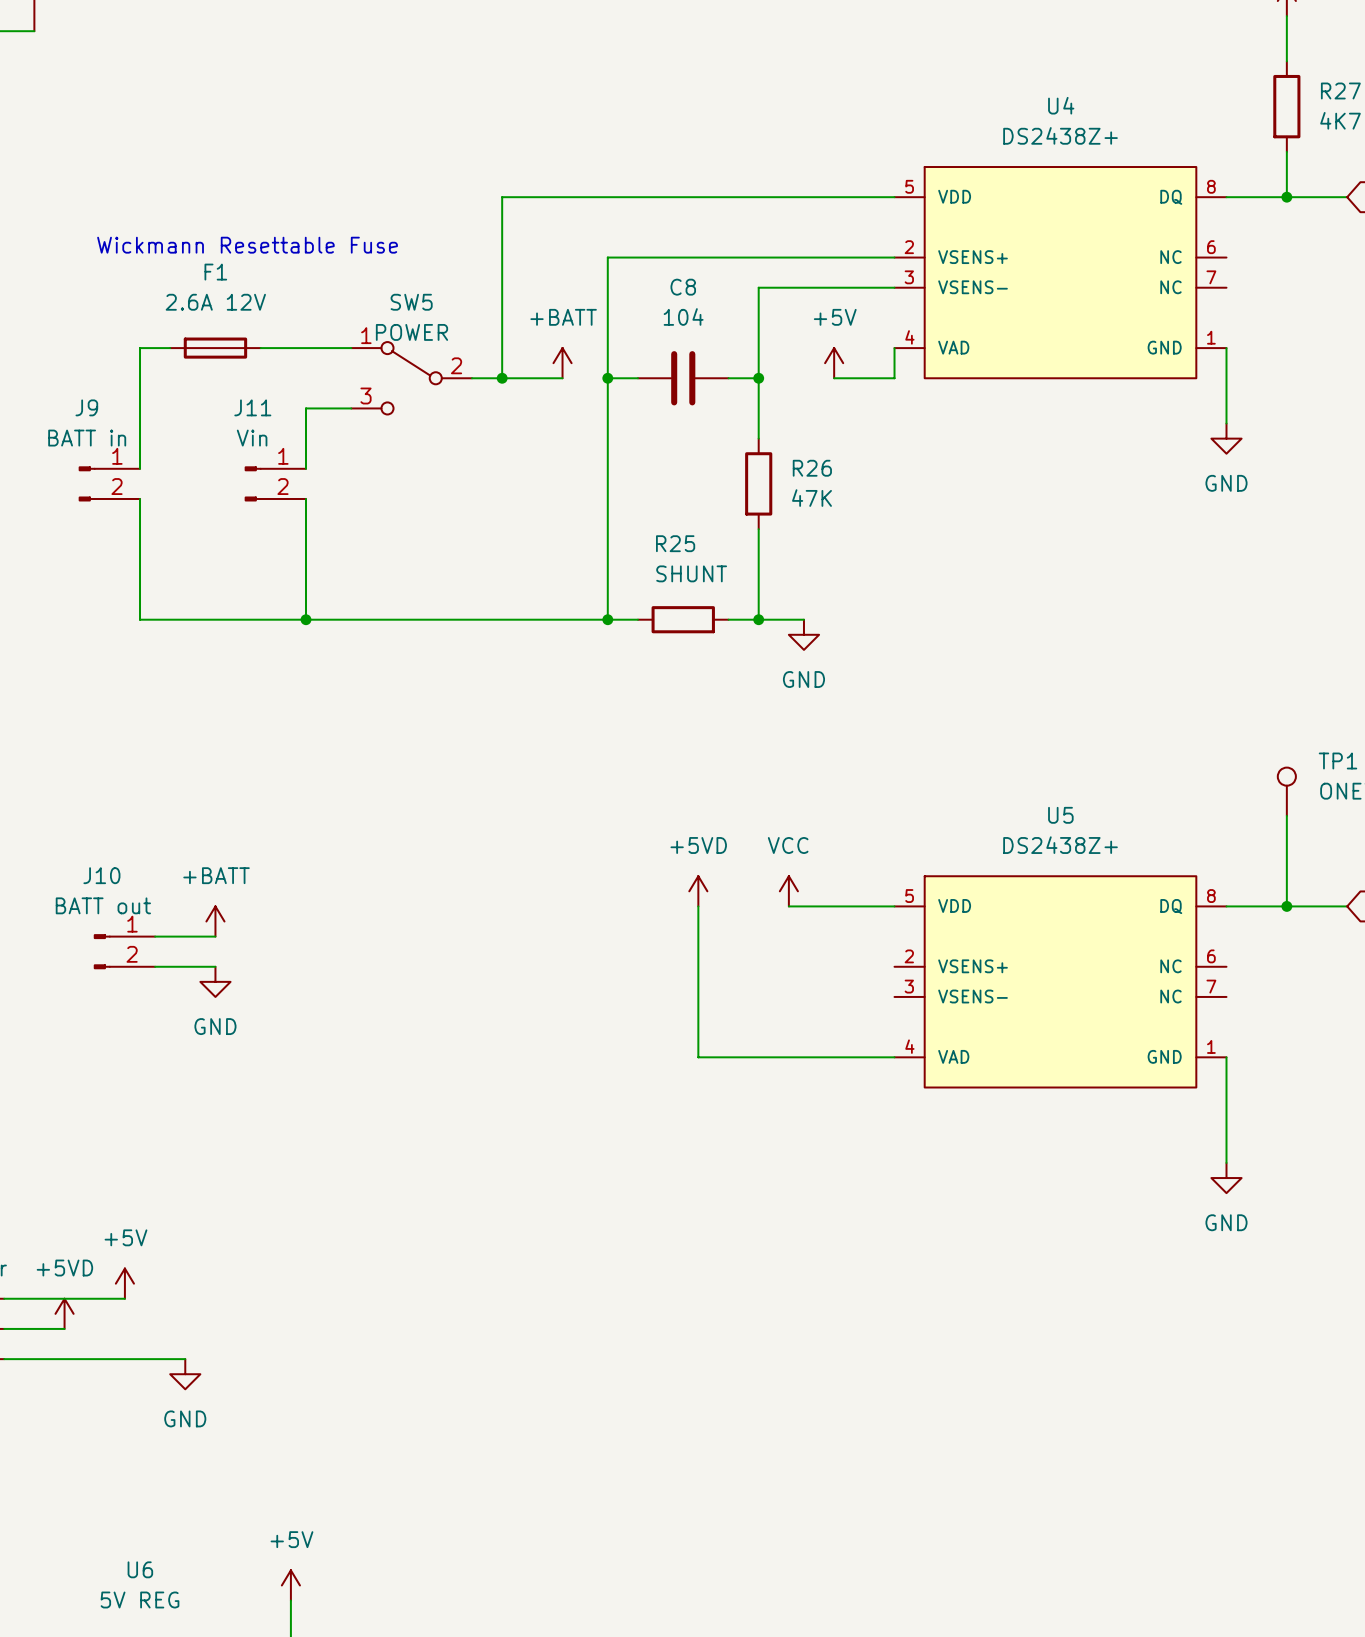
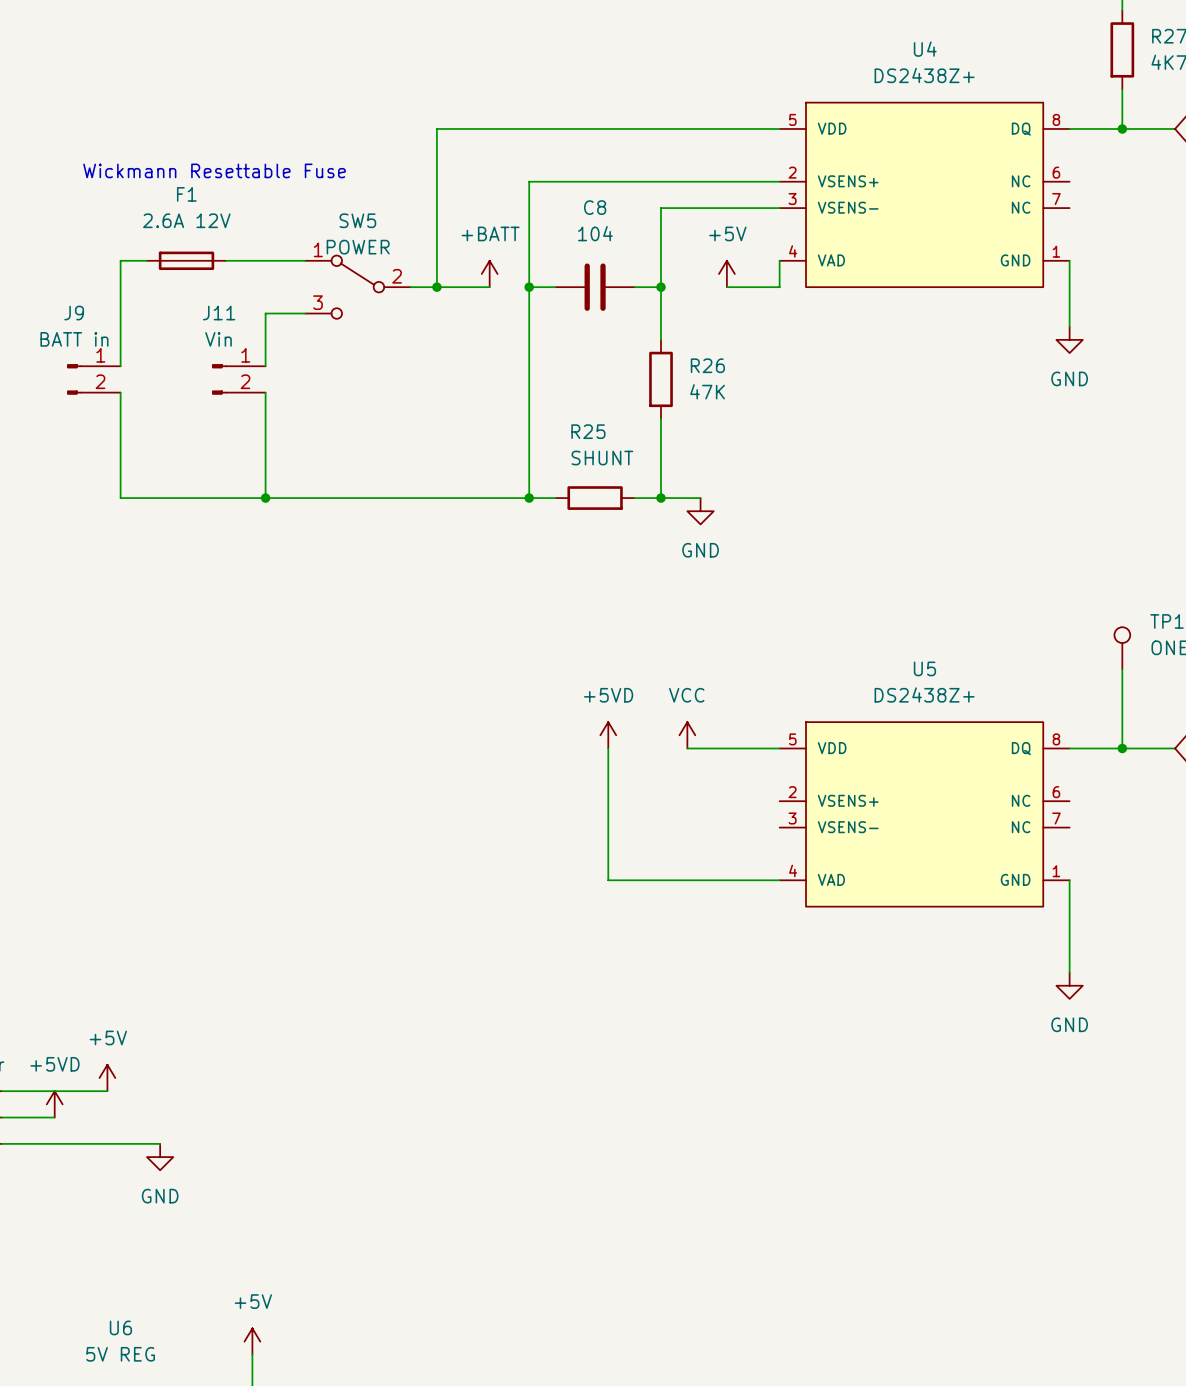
power symbol: +BATT (215, 921) -> none
wire: (155, 936) (215, 936) -> none
J10: BATT out (124, 951) -> none
wire: (155, 966) (215, 966) -> none
power symbol: GND (215, 981) -> none

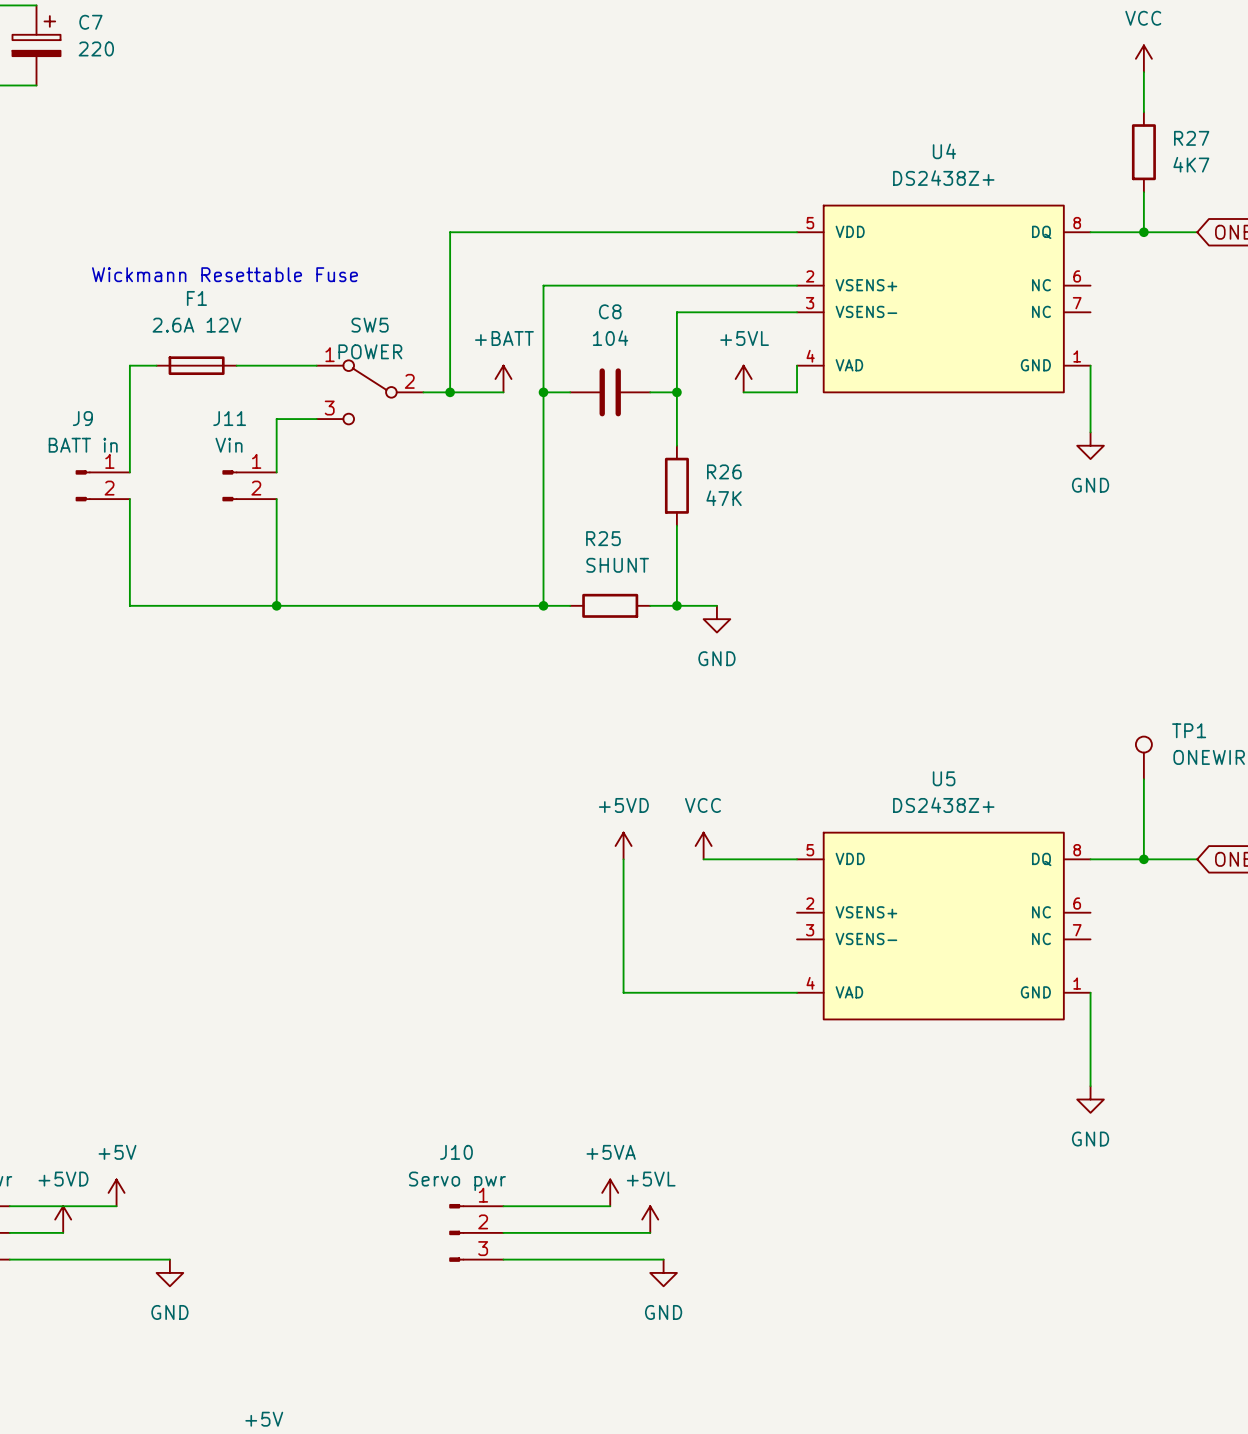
power symbol: +5V (726, 273) -> +5VL (743, 379)
power symbol: none -> +5VA (610, 1192)
wire: none -> (503, 1206) (610, 1206)
power symbol: none -> +5VL (650, 1219)
J10: none -> Servo pwr (476, 1232)
wire: none -> (503, 1232) (650, 1232)
wire: none -> (503, 1259) (663, 1259)
power symbol: none -> GND (663, 1272)

